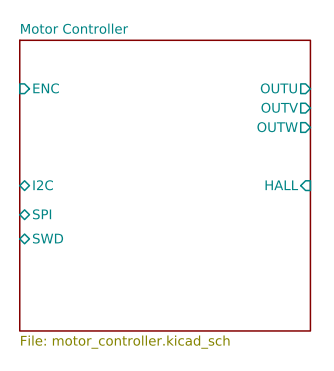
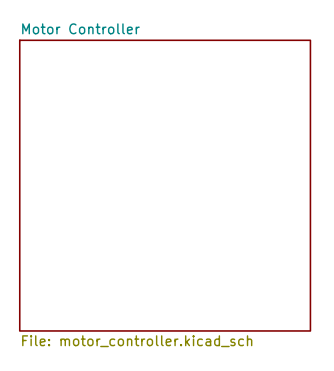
sheet pin: ENC (46, 88) -> none
sheet pin: OUTU (278, 88) -> none
sheet pin: OUTV (279, 107) -> none
sheet pin: OUTW (277, 127) -> none
sheet pin: I2C (43, 185) -> none
sheet pin: HALL (281, 185) -> none
sheet pin: SPI (42, 214) -> none
sheet pin: SWD (48, 238) -> none

